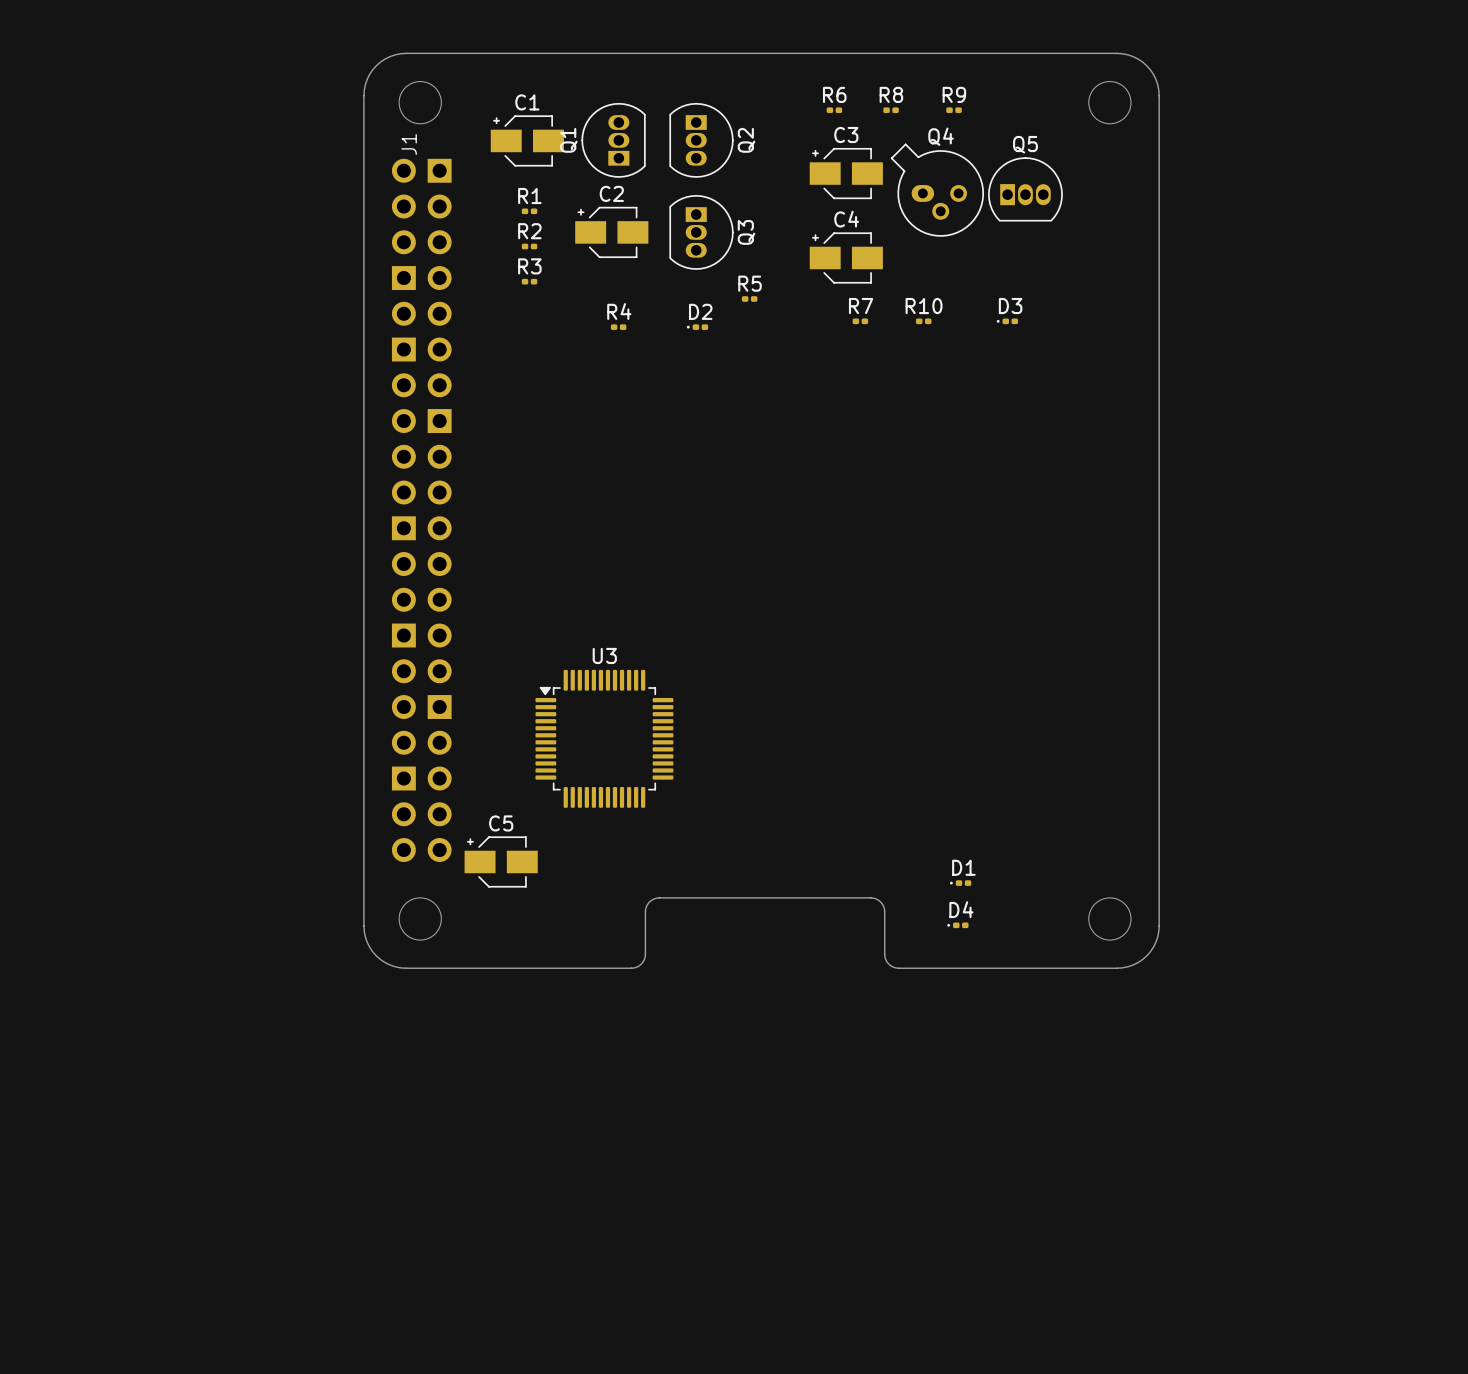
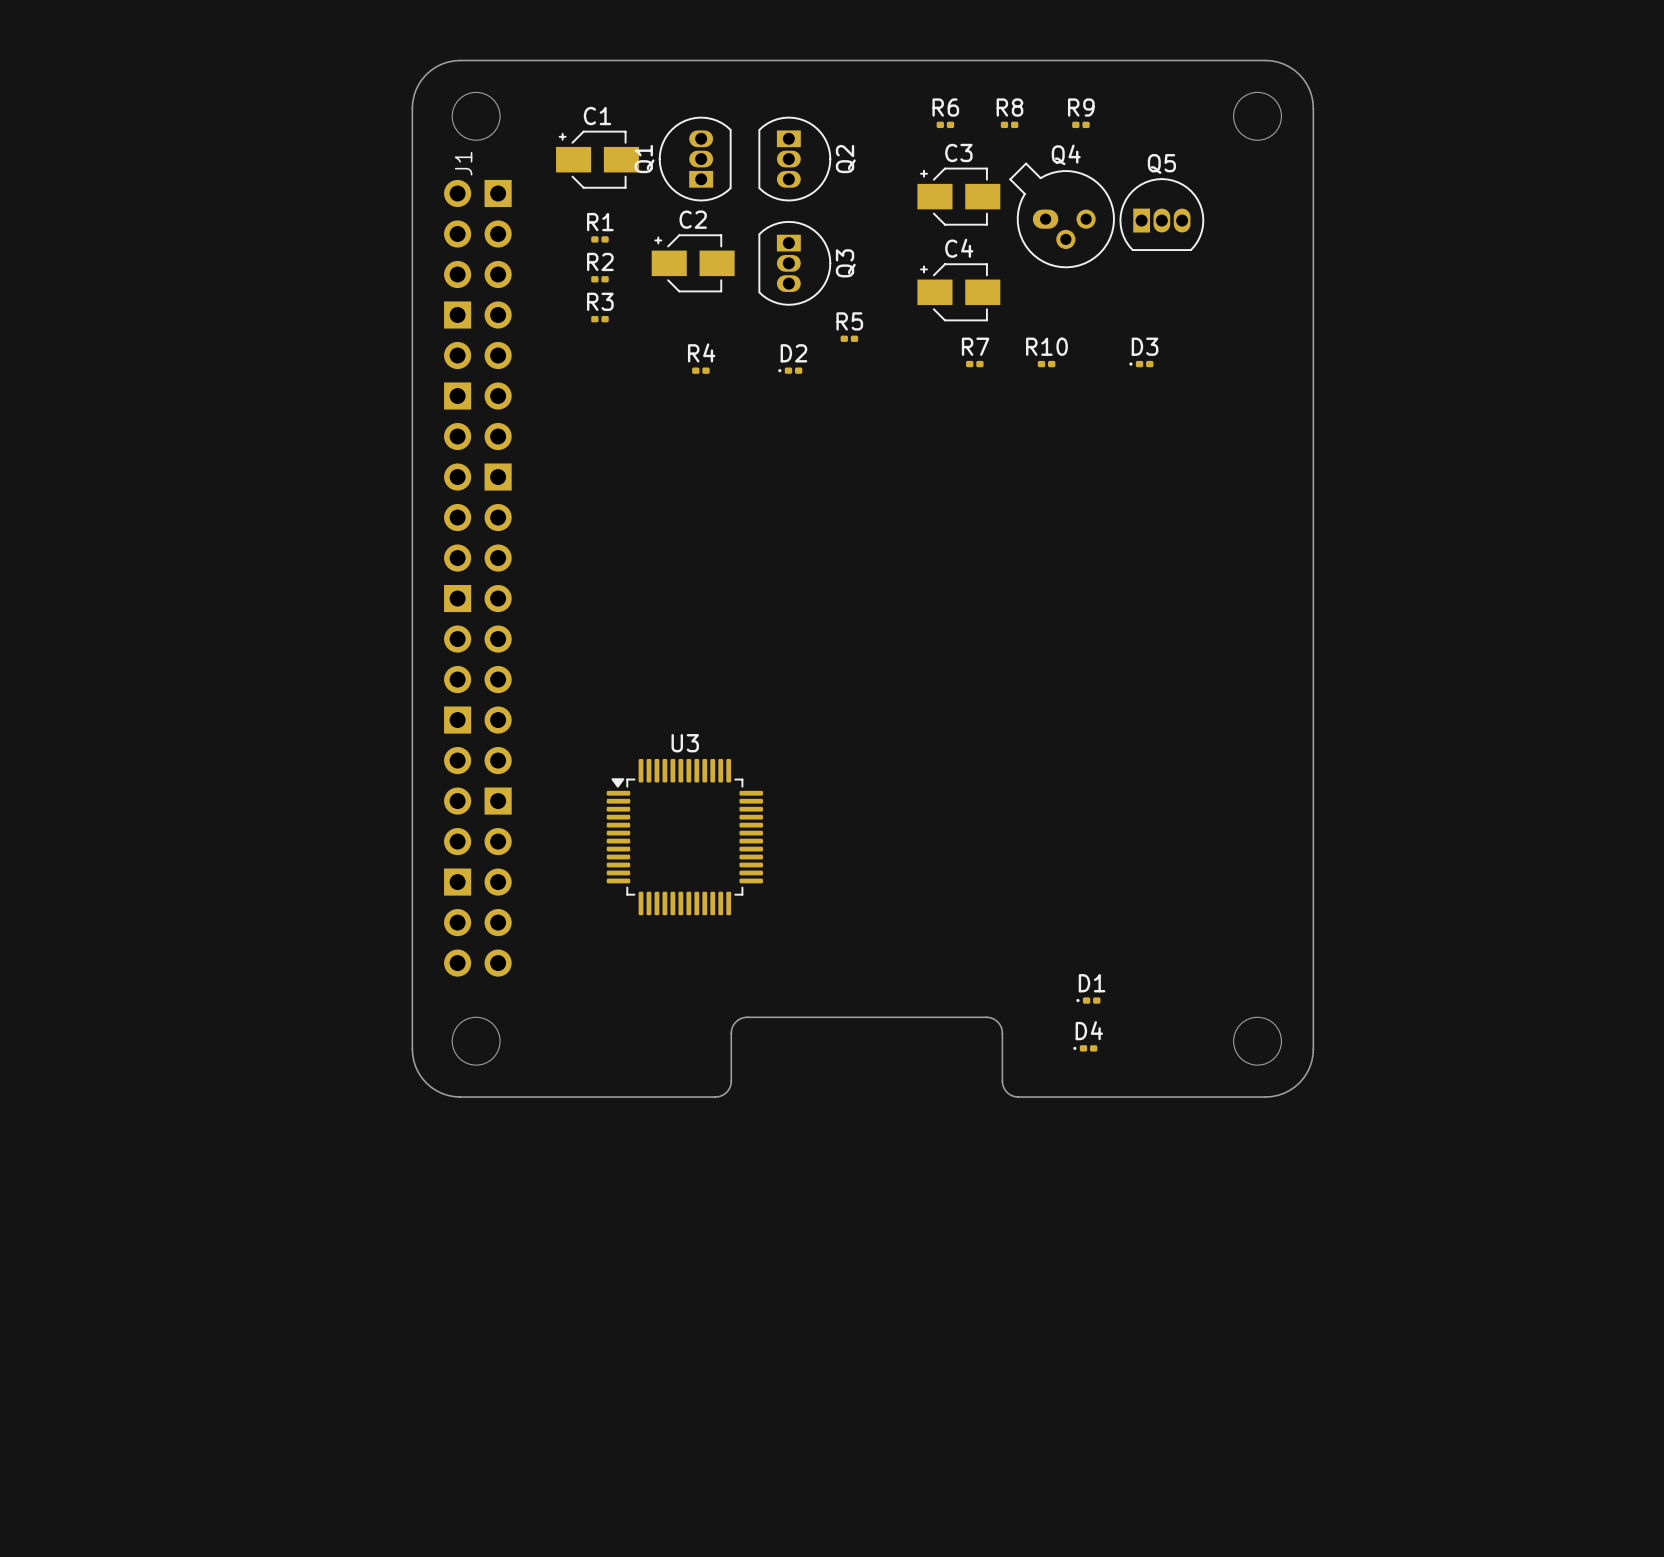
C5: (501, 861) -> none

